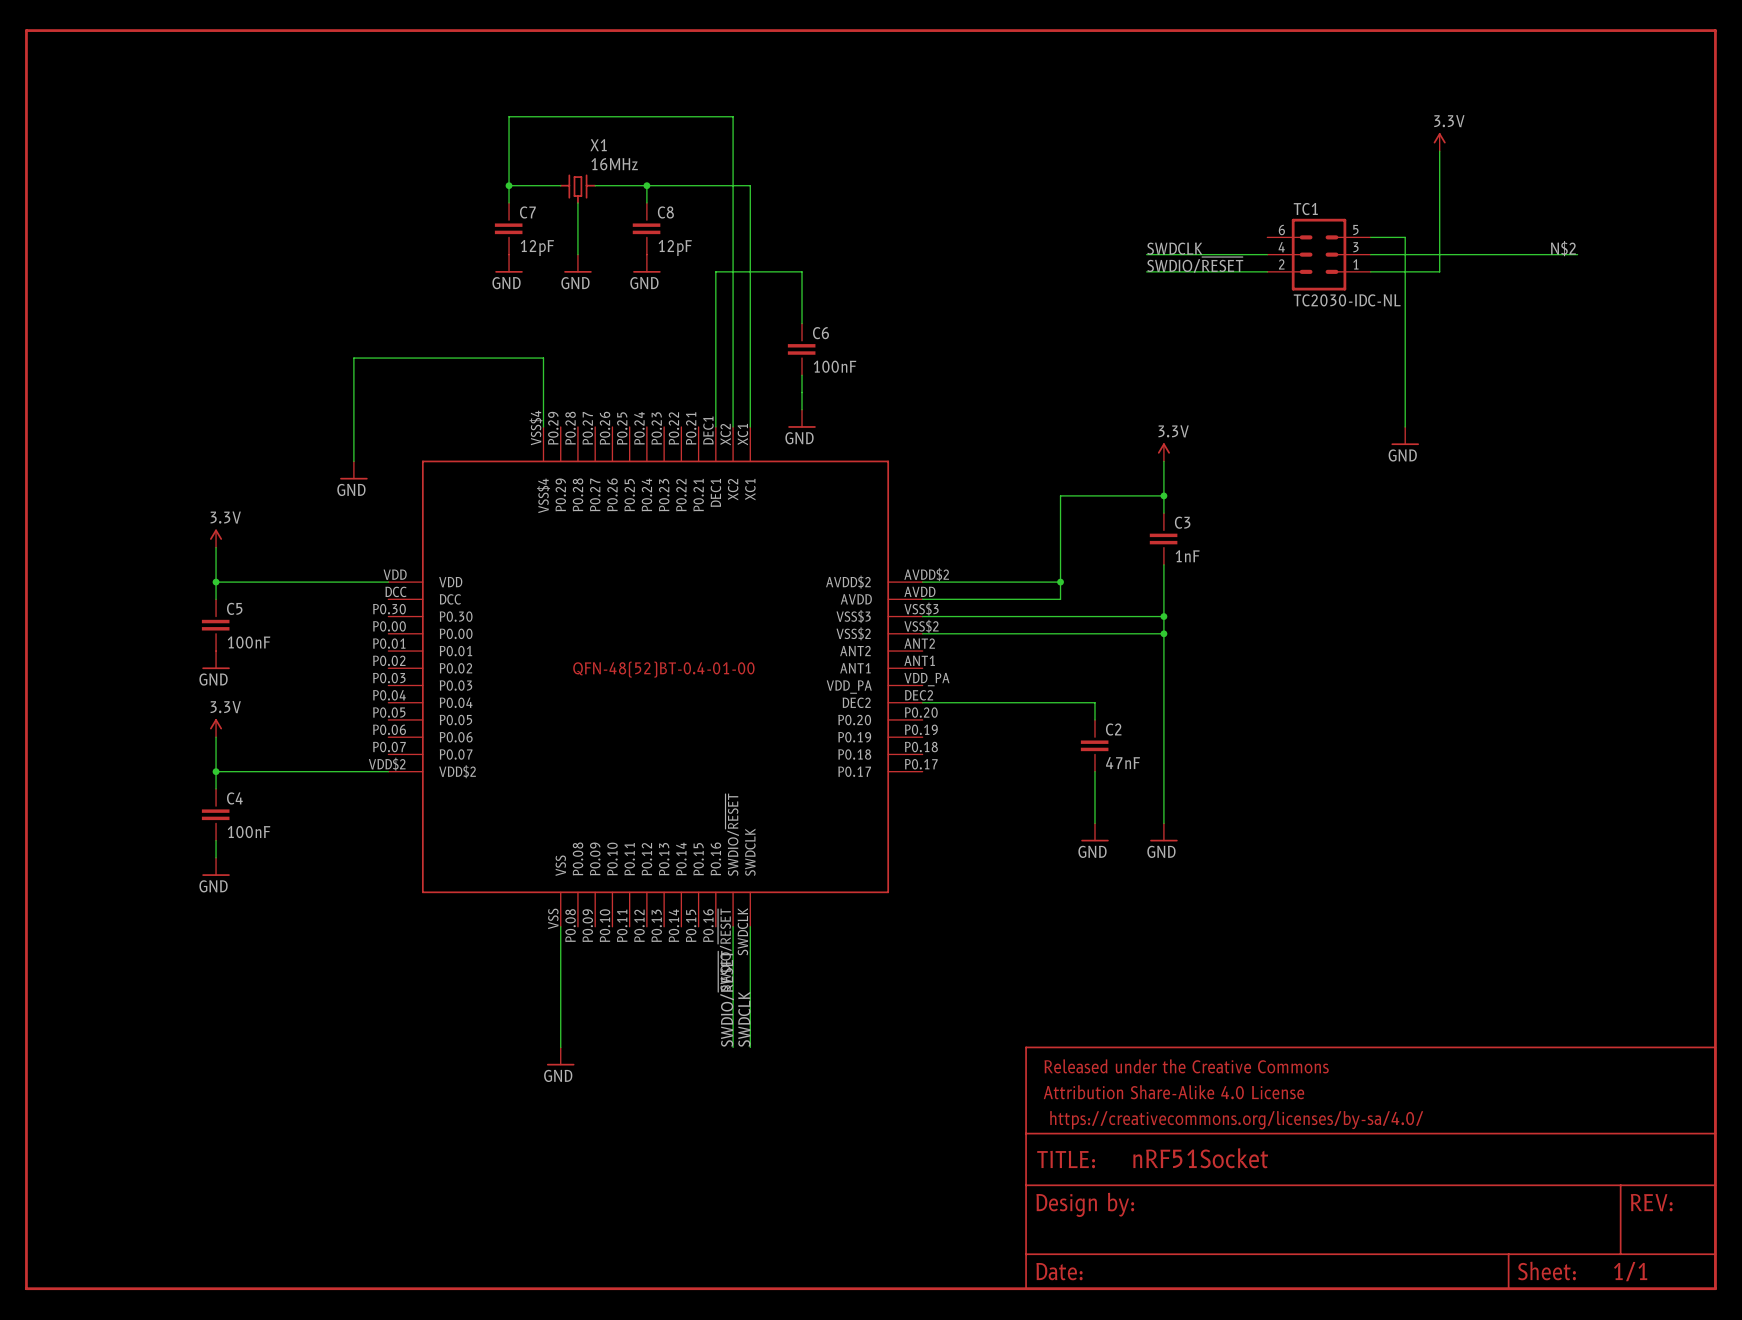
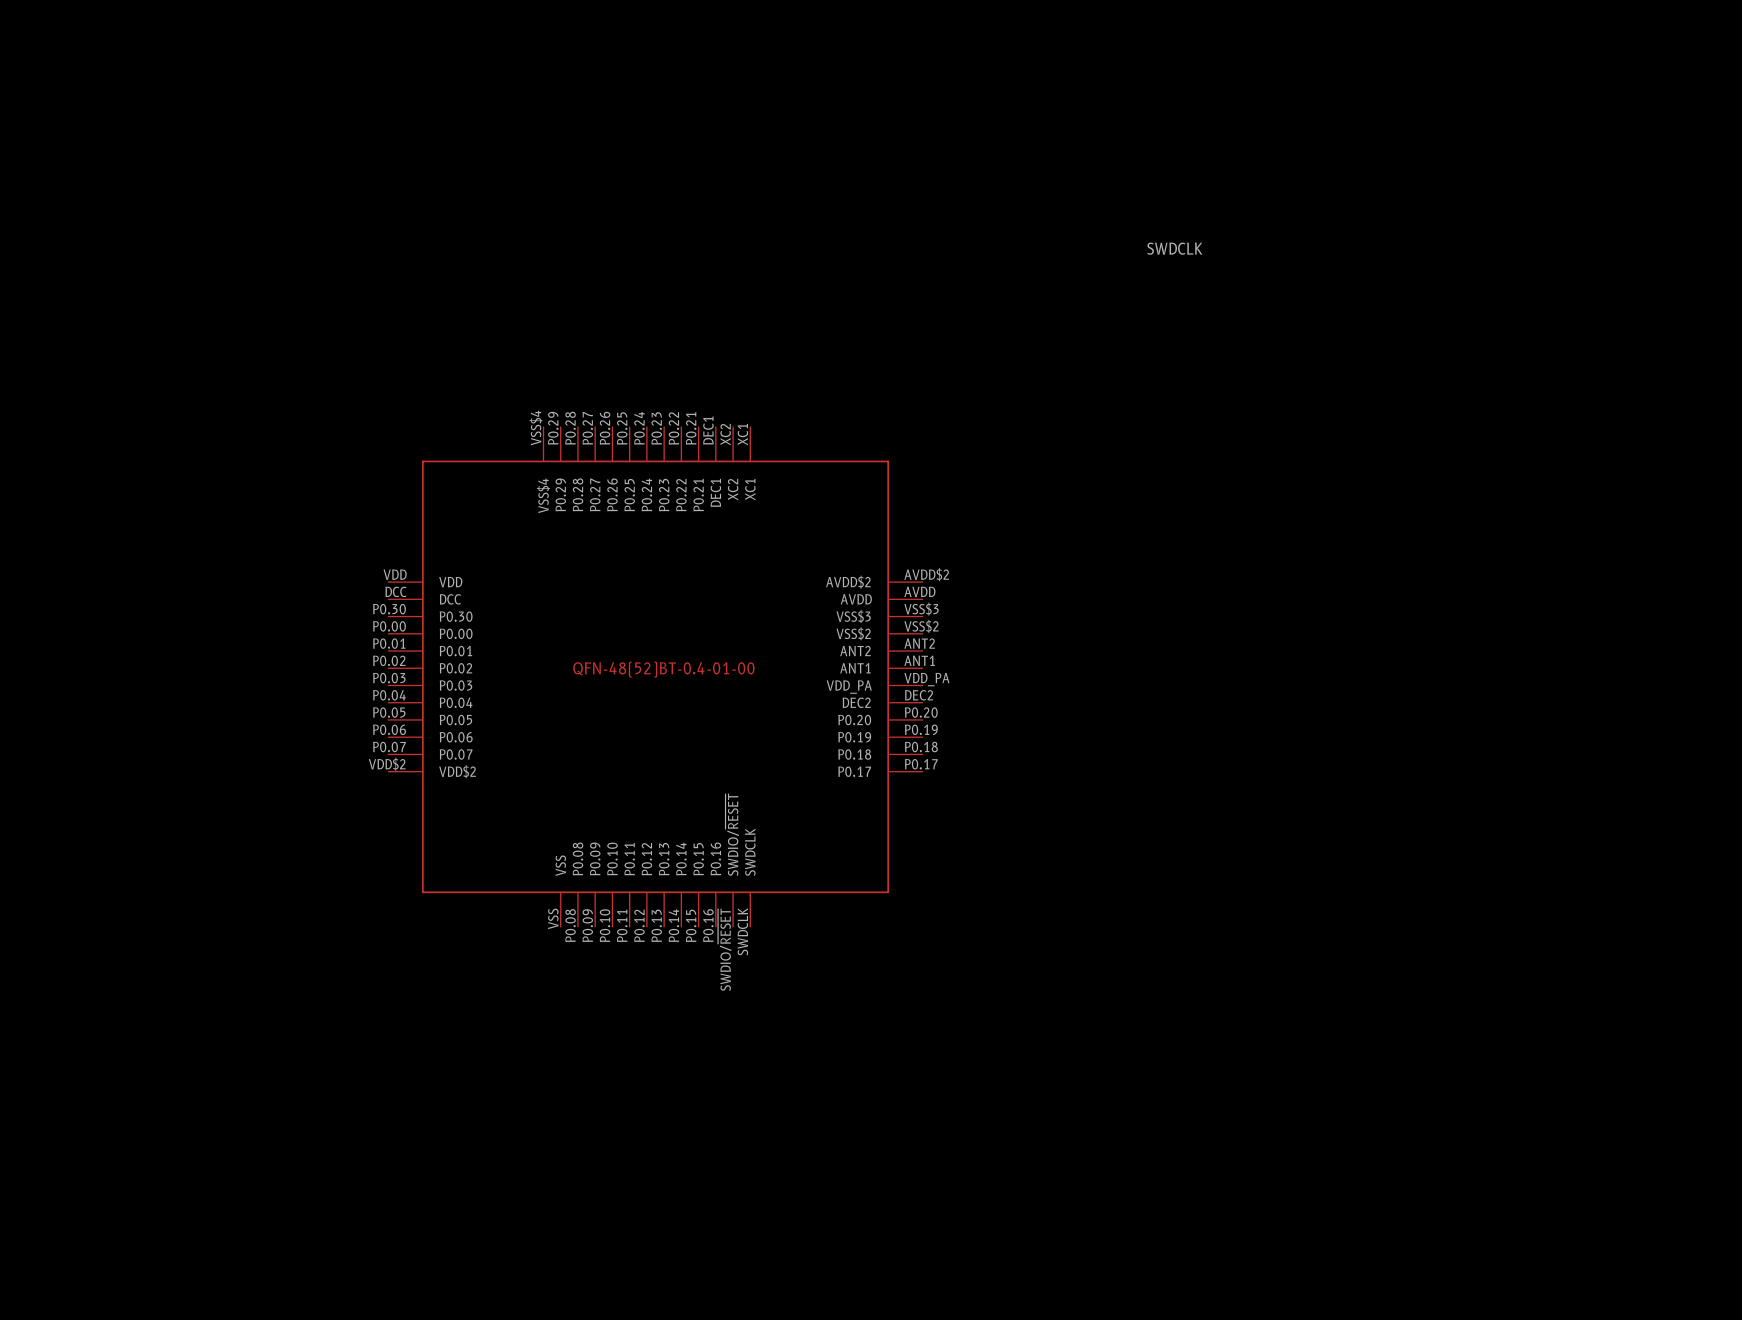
power symbol: 3.3V (1439, 142) -> none
wire: (1439, 151) (1439, 271) (1370, 271) -> none
wire: (509, 185) (560, 185) -> none
junction: (509, 185) -> none
wire: (595, 185) (750, 185) (750, 426) -> none
wire: (646, 185) (646, 202) -> none
junction: (646, 185) -> none
X1: 16MHz (577, 189) -> none
wire: (509, 202) (509, 116) (733, 116) (733, 426) -> none
wire: (577, 202) (577, 254) -> none
C7: 12pF (508, 228) -> none
C8: 12pF (646, 228) -> none
wire: (1370, 237) (1405, 237) (1405, 426) -> none
label: N$2 (1563, 248) -> none
wire: (1146, 254) (1267, 254) -> none
TC1: TC2030-IDC-NL (1319, 254) -> none
wire: (1370, 254) (1577, 254) -> none
power symbol: GND (509, 263) -> none
power symbol: GND (577, 263) -> none
power symbol: GND (646, 263) -> none
label: SWDIO/~{RESET} (1195, 264) -> none
wire: (1146, 271) (1267, 271) -> none
wire: (802, 323) (802, 271) (715, 271) (715, 426) -> none
C6: 100nF (801, 349) -> none
wire: (802, 375) (802, 409) -> none
power symbol: GND (802, 418) -> none
wire: (543, 426) (543, 358) (353, 358) (353, 461) -> none
power symbol: GND (1405, 436) -> none
power symbol: 3.3V (1163, 452) -> none
wire: (1163, 461) (1163, 513) -> none
power symbol: GND (353, 470) -> none
wire: (1163, 495) (1060, 495) (1060, 599) (922, 599) -> none
junction: (1163, 495) -> none
power symbol: 3.3V (216, 538) -> none
C3: 1nF (1163, 539) -> none
wire: (216, 547) (216, 599) -> none
wire: (1163, 564) (1163, 823) -> none
wire: (216, 582) (388, 582) -> none
junction: (216, 582) -> none
wire: (922, 582) (1060, 582) -> none
junction: (1060, 582) -> none
wire: (922, 616) (1163, 616) -> none
junction: (1163, 616) -> none
C5: 100nF (215, 625) -> none
wire: (922, 633) (1163, 633) -> none
junction: (1163, 633) -> none
part: (870, 659) -> none
power symbol: GND (216, 660) -> none
wire: (922, 702) (1094, 702) (1094, 719) -> none
power symbol: 3.3V (216, 728) -> none
wire: (216, 737) (216, 788) -> none
C2: 47nF (1094, 745) -> none
wire: (216, 771) (388, 771) -> none
junction: (216, 771) -> none
wire: (1094, 771) (1094, 823) -> none
C4: 100nF (215, 814) -> none
power symbol: GND (1094, 832) -> none
power symbol: GND (1163, 832) -> none
wire: (216, 840) (216, 857) -> none
power symbol: GND (216, 866) -> none
wire: (560, 926) (560, 1047) -> none
wire: (733, 926) (733, 1047) -> none
wire: (750, 926) (750, 1047) -> none
label: SWDIO/~{RESET} (726, 998) -> none
label: SWDCLK (744, 1019) -> none
power symbol: GND (560, 1056) -> none
part: (1370, 1168) -> none

